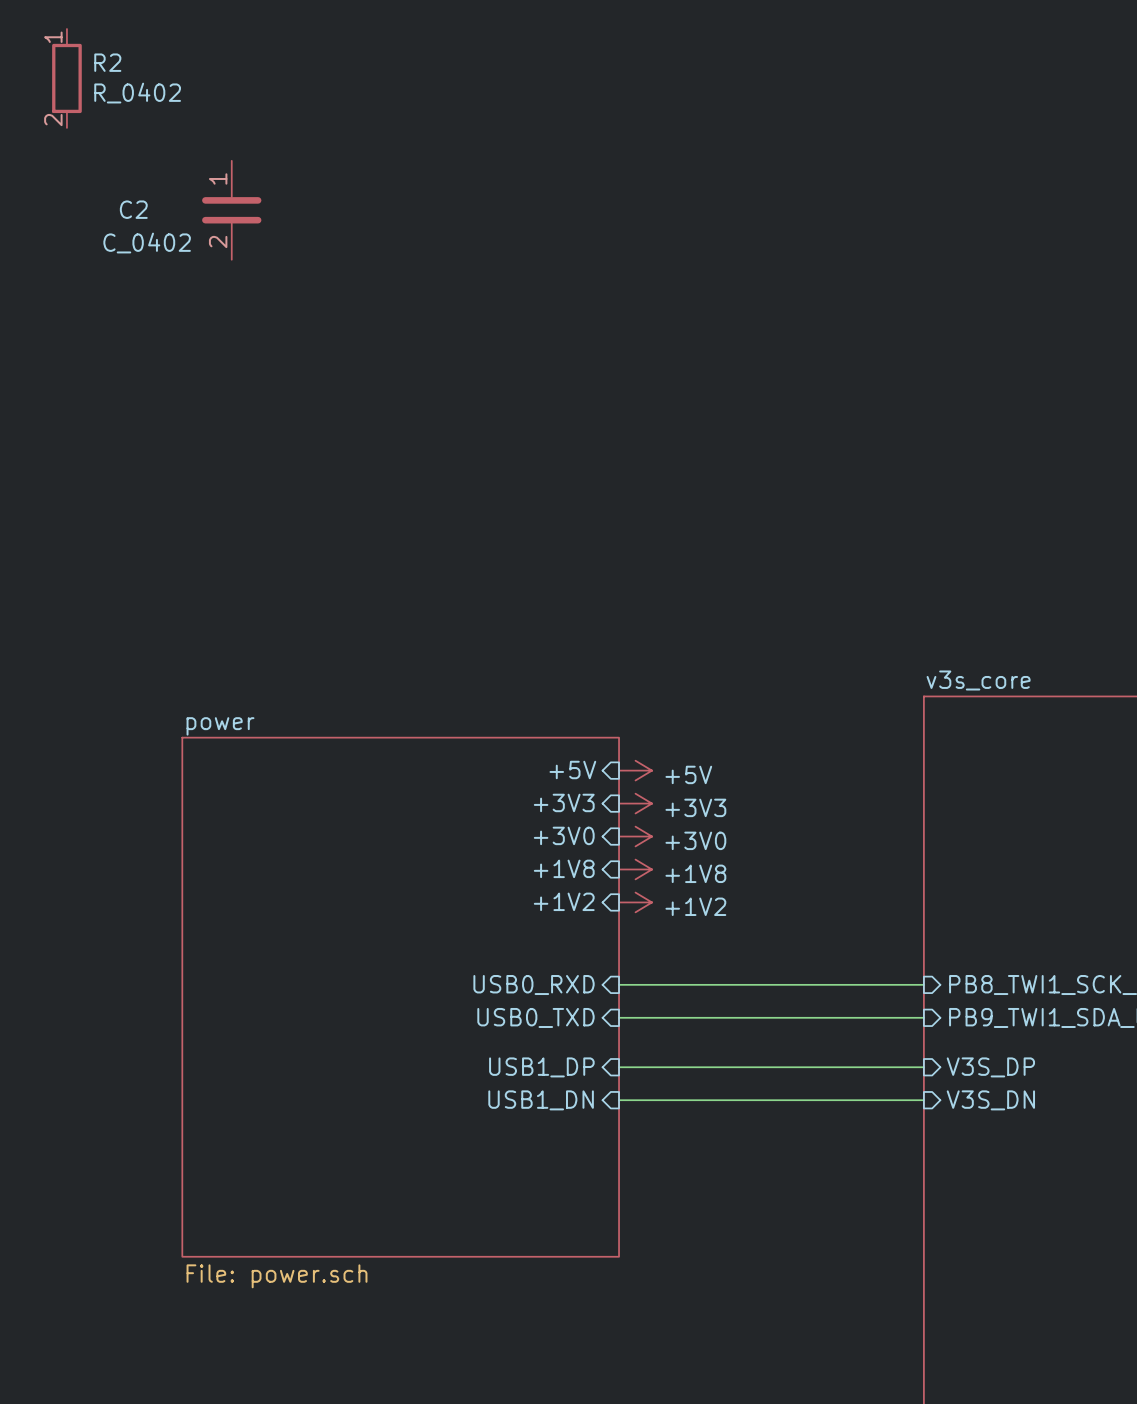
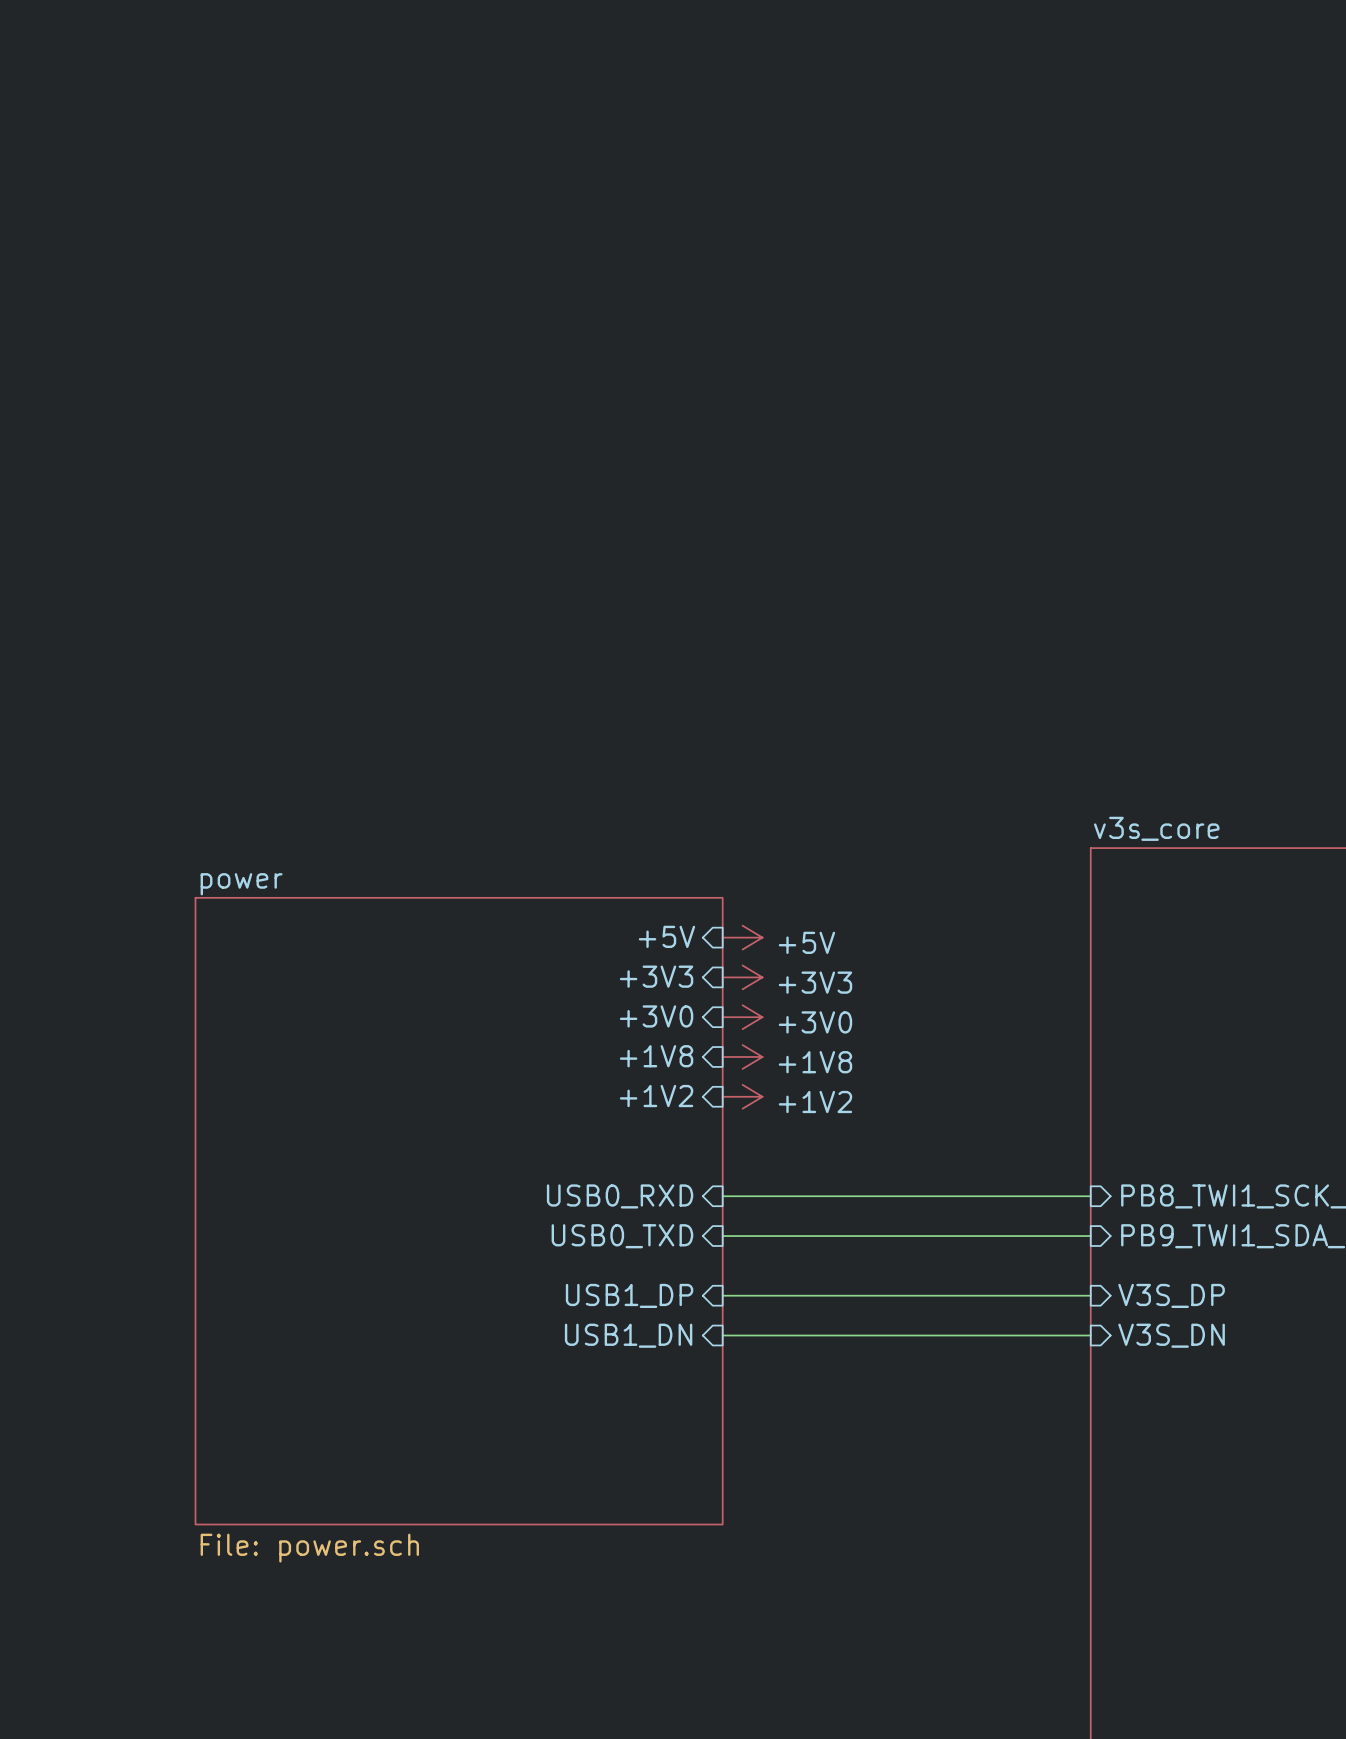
R2: R_0402 (66, 78) -> none
C2: C_0402 (231, 210) -> none

